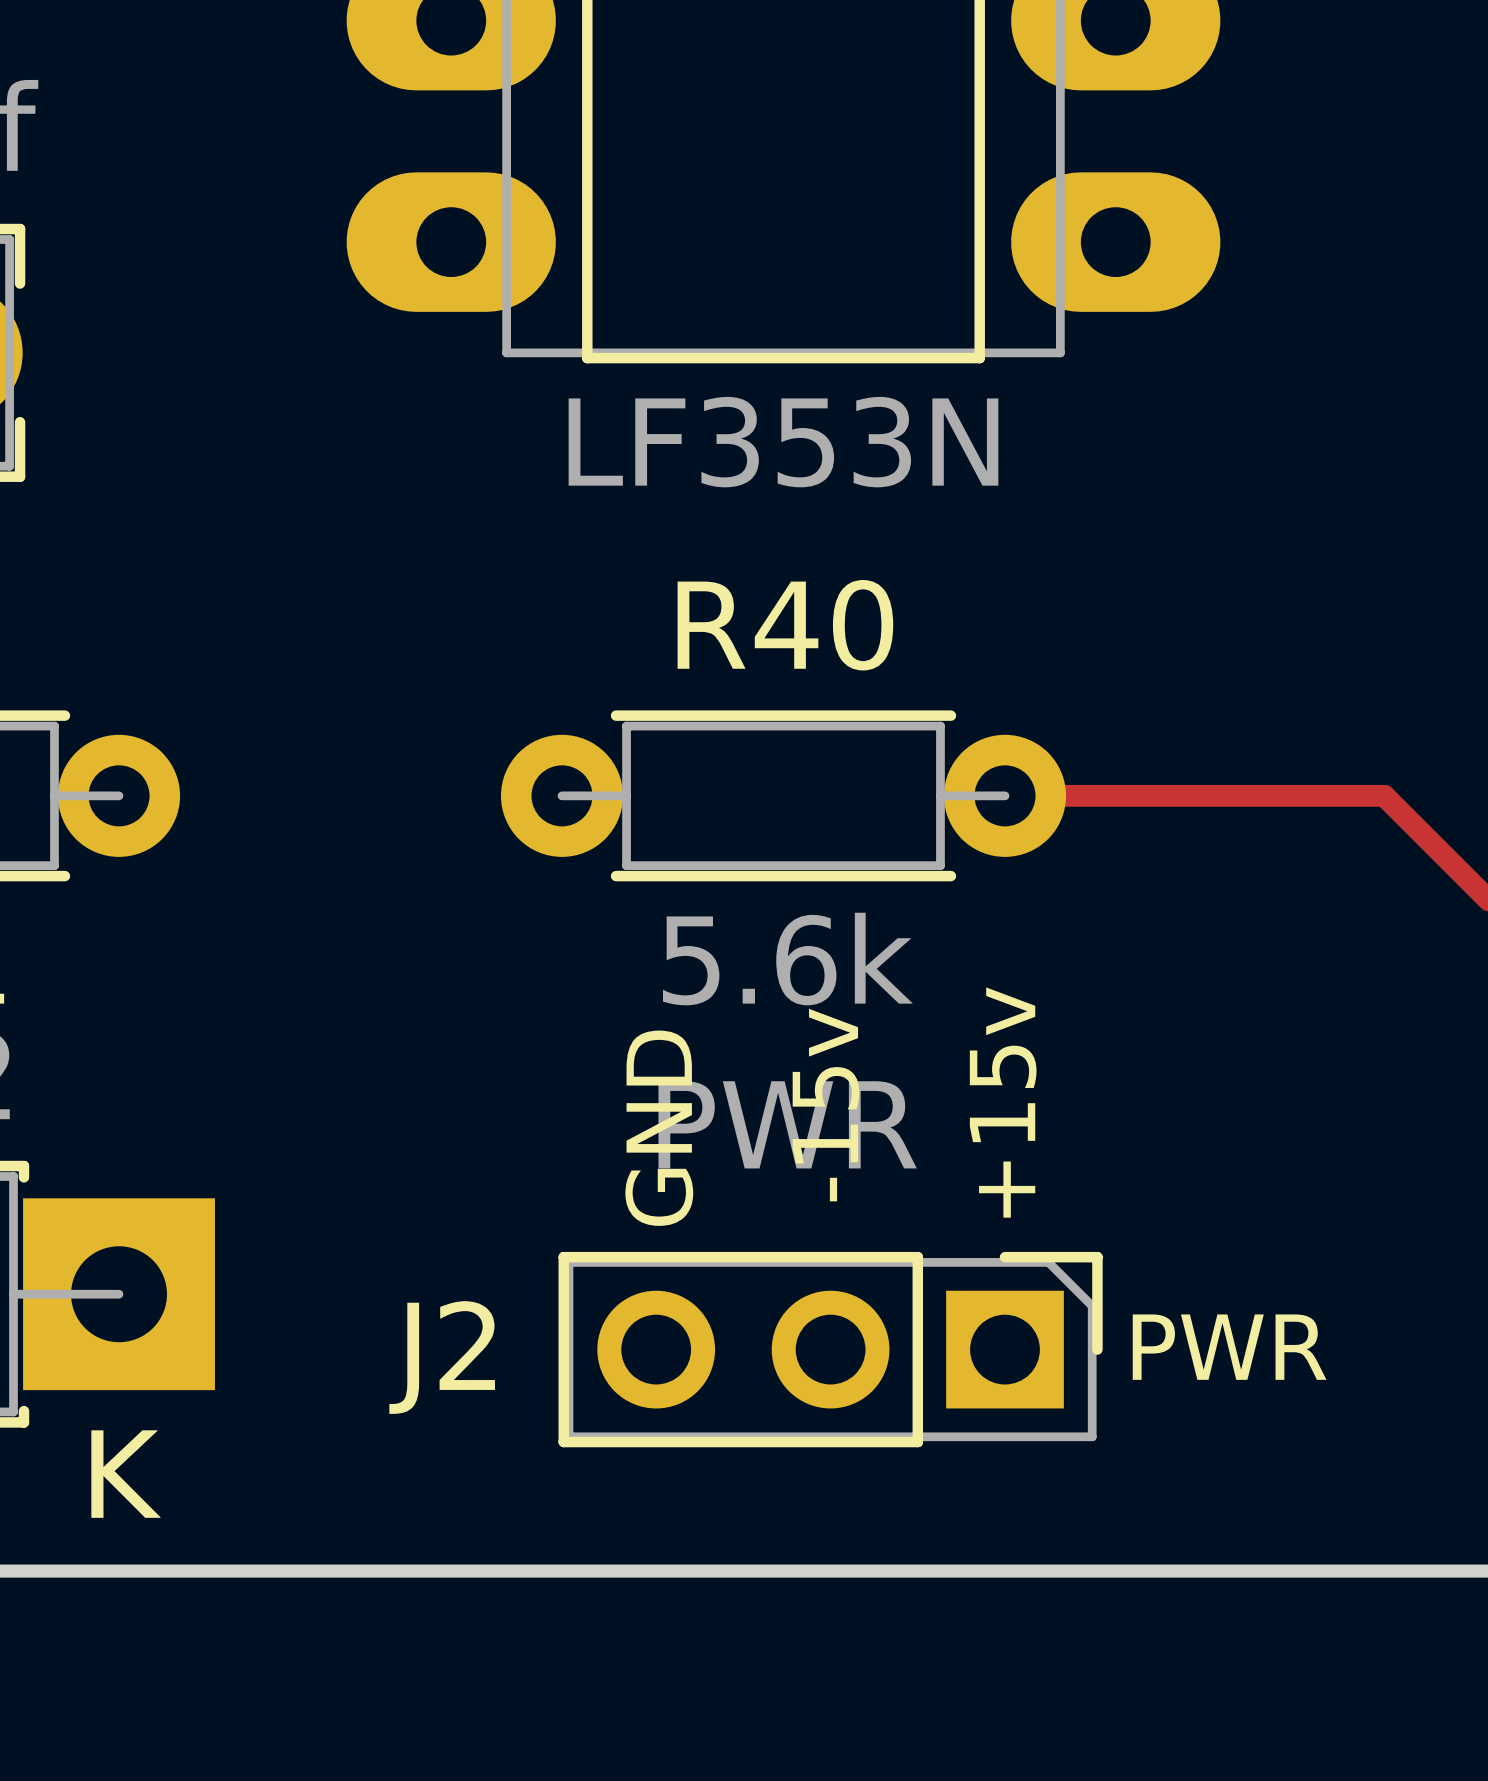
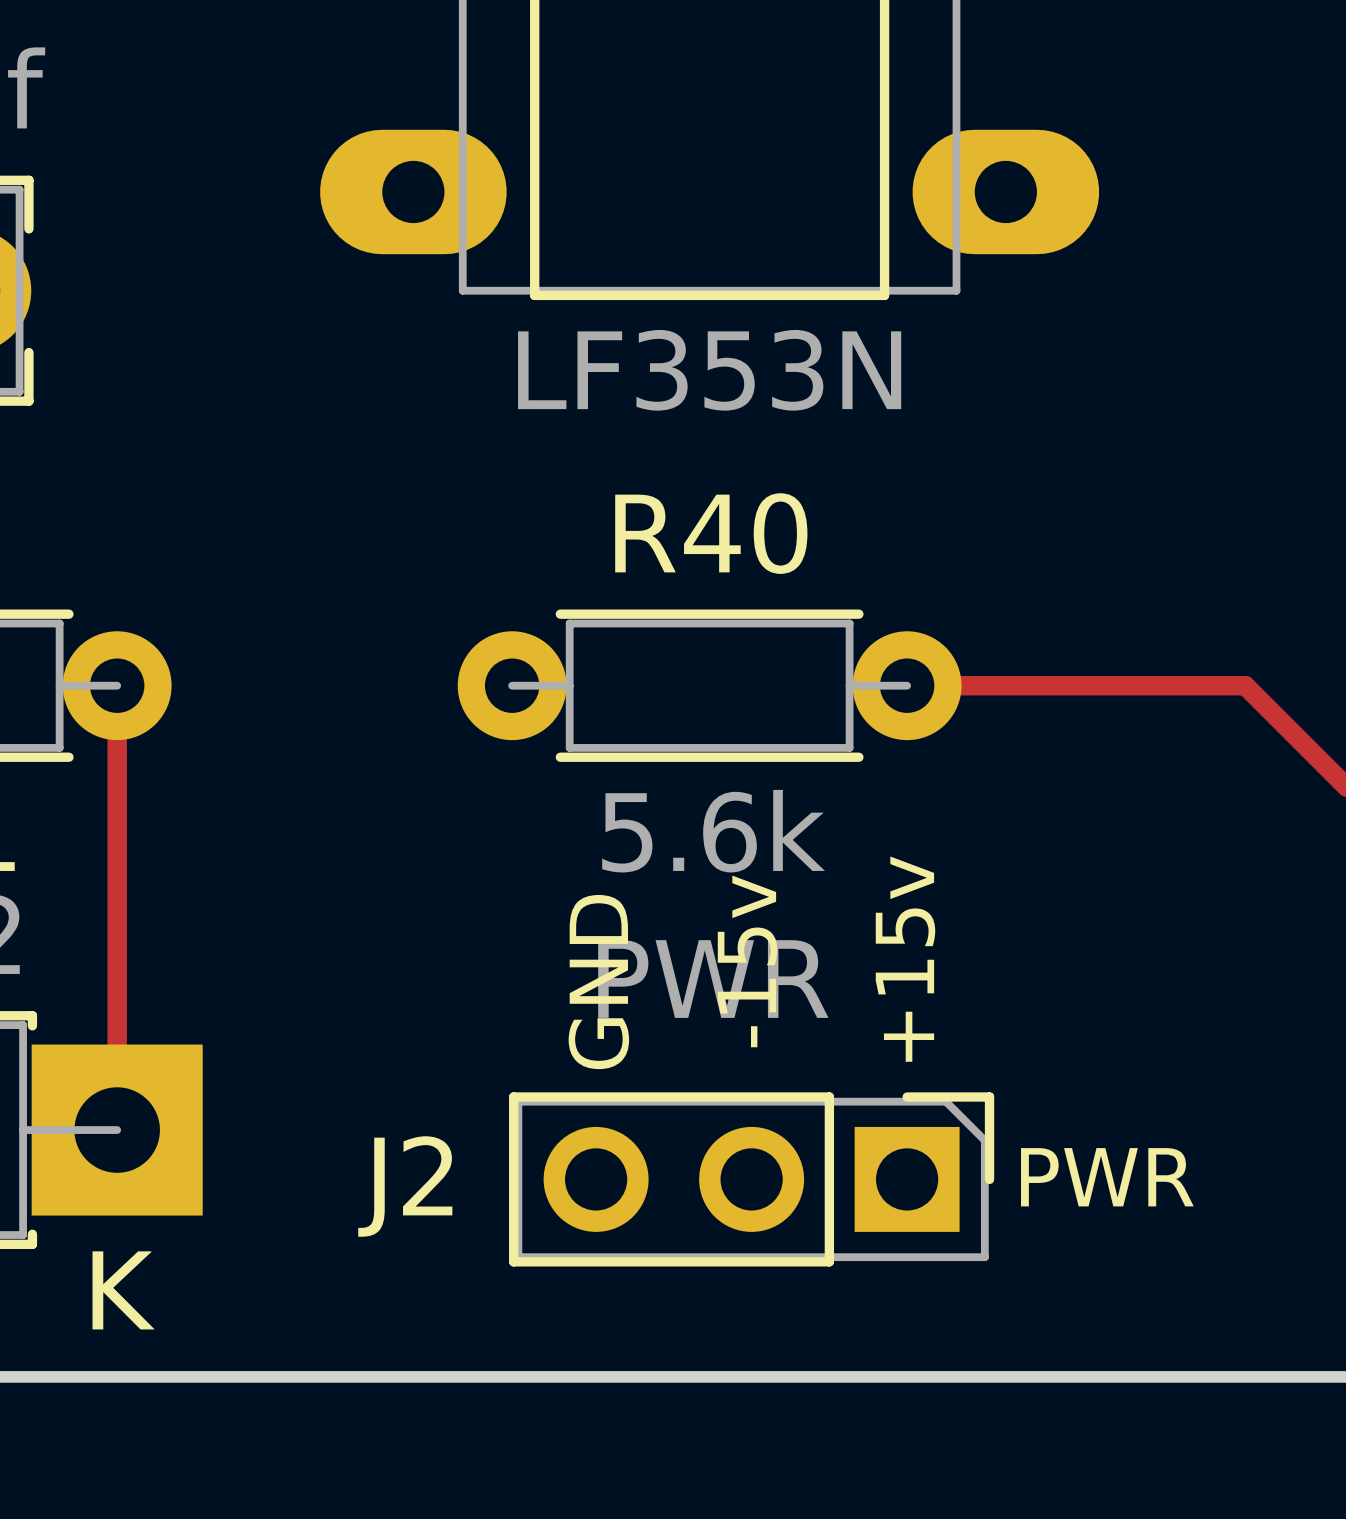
track: none -> (117, 685) (117, 1130)

